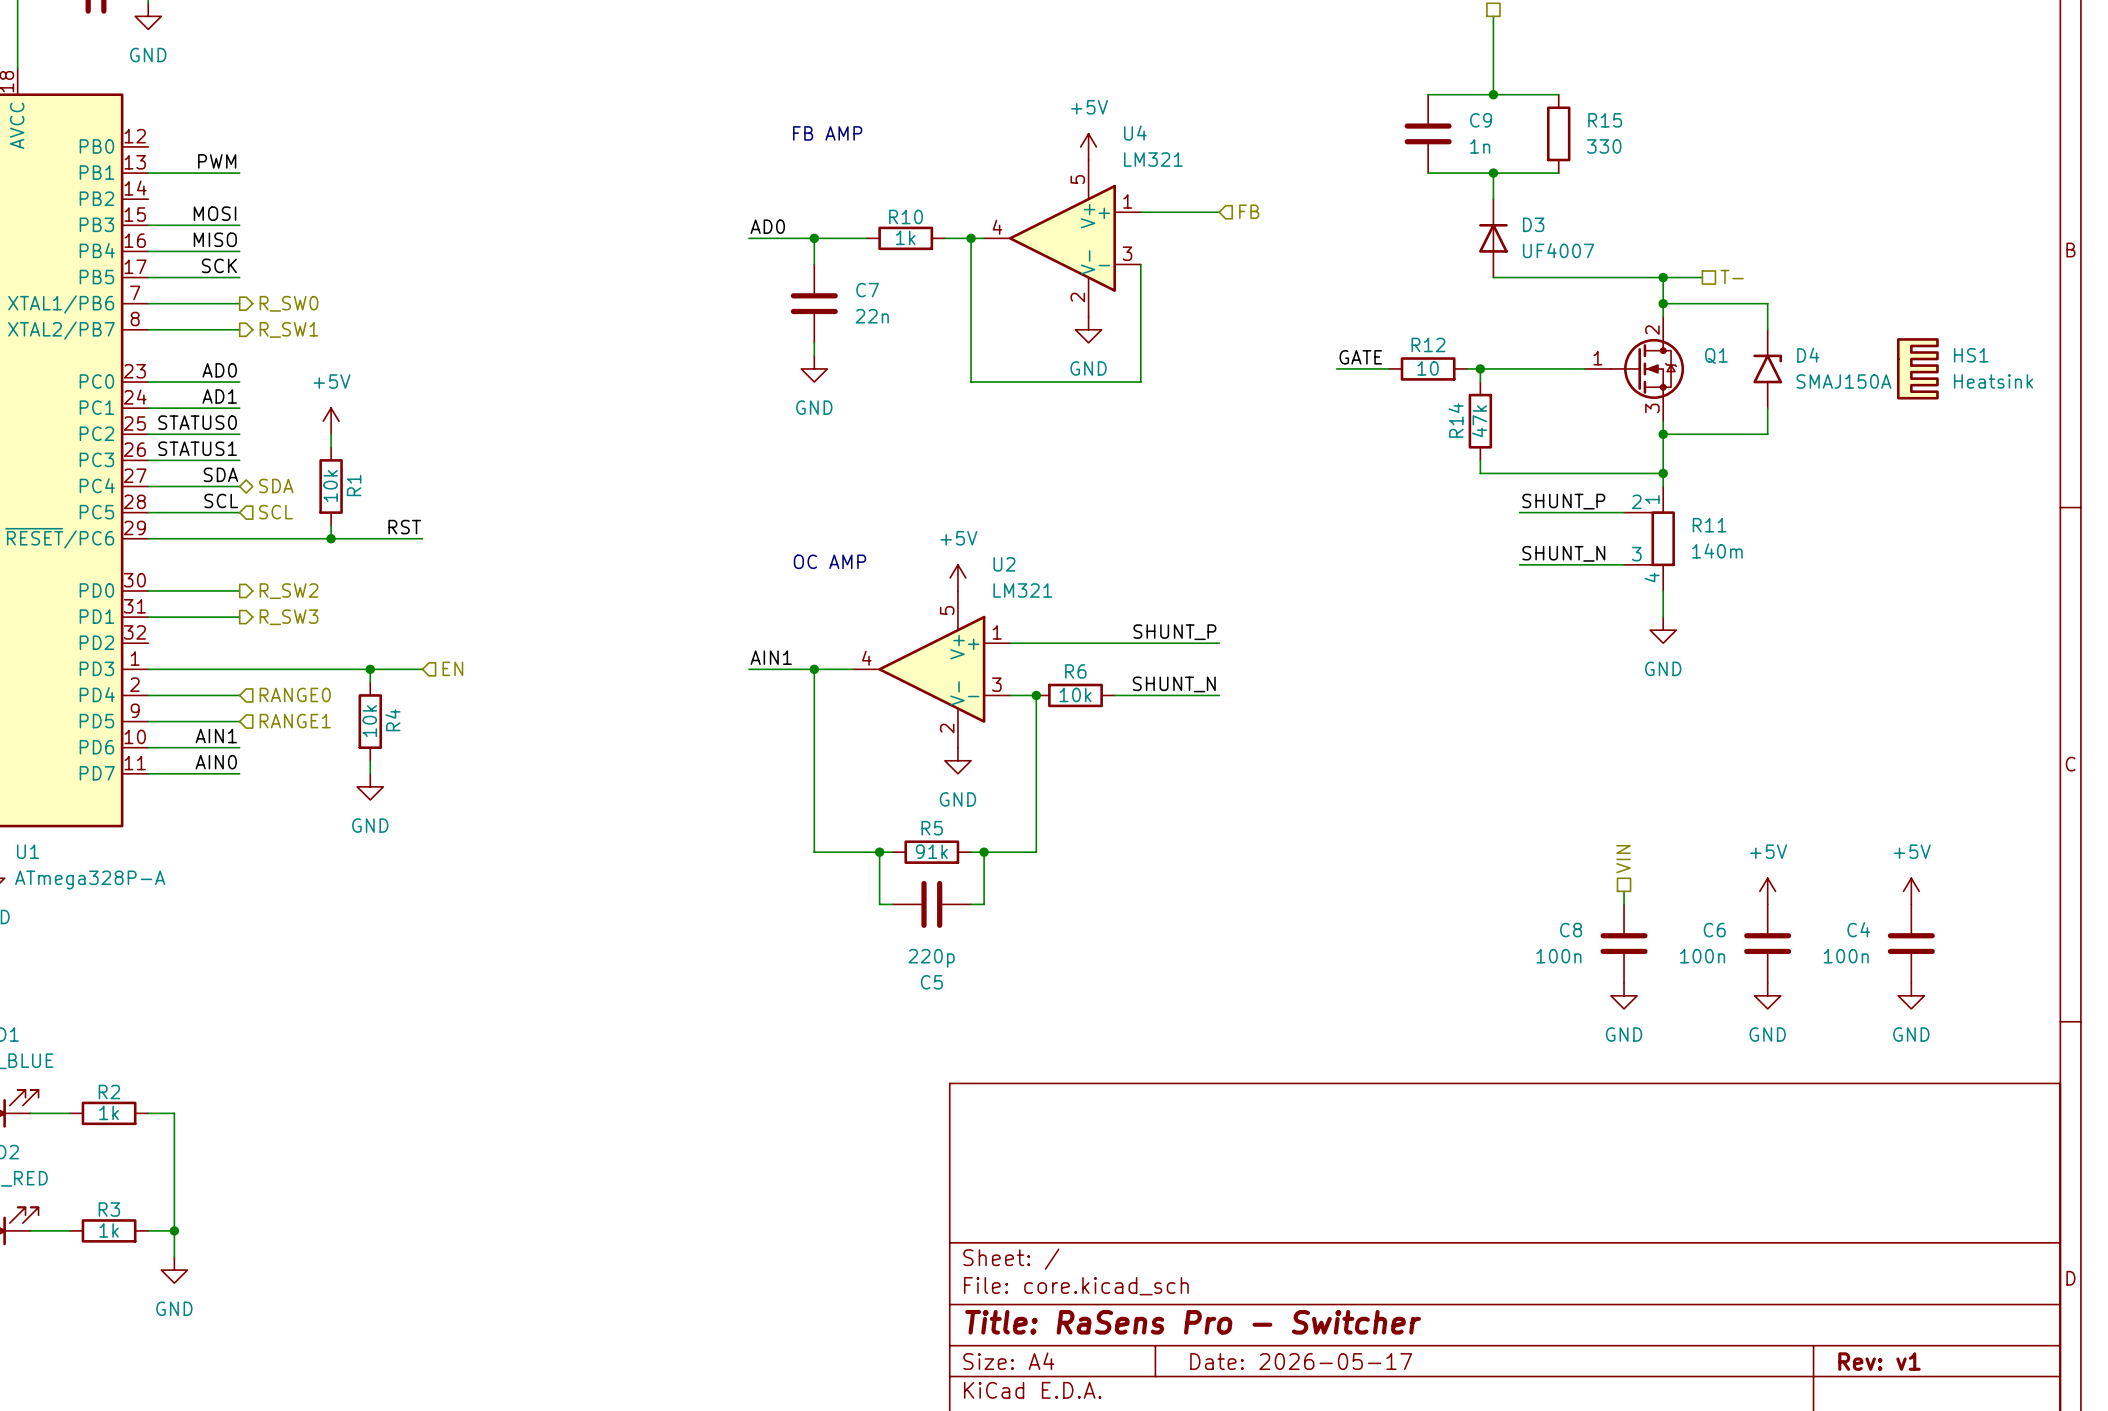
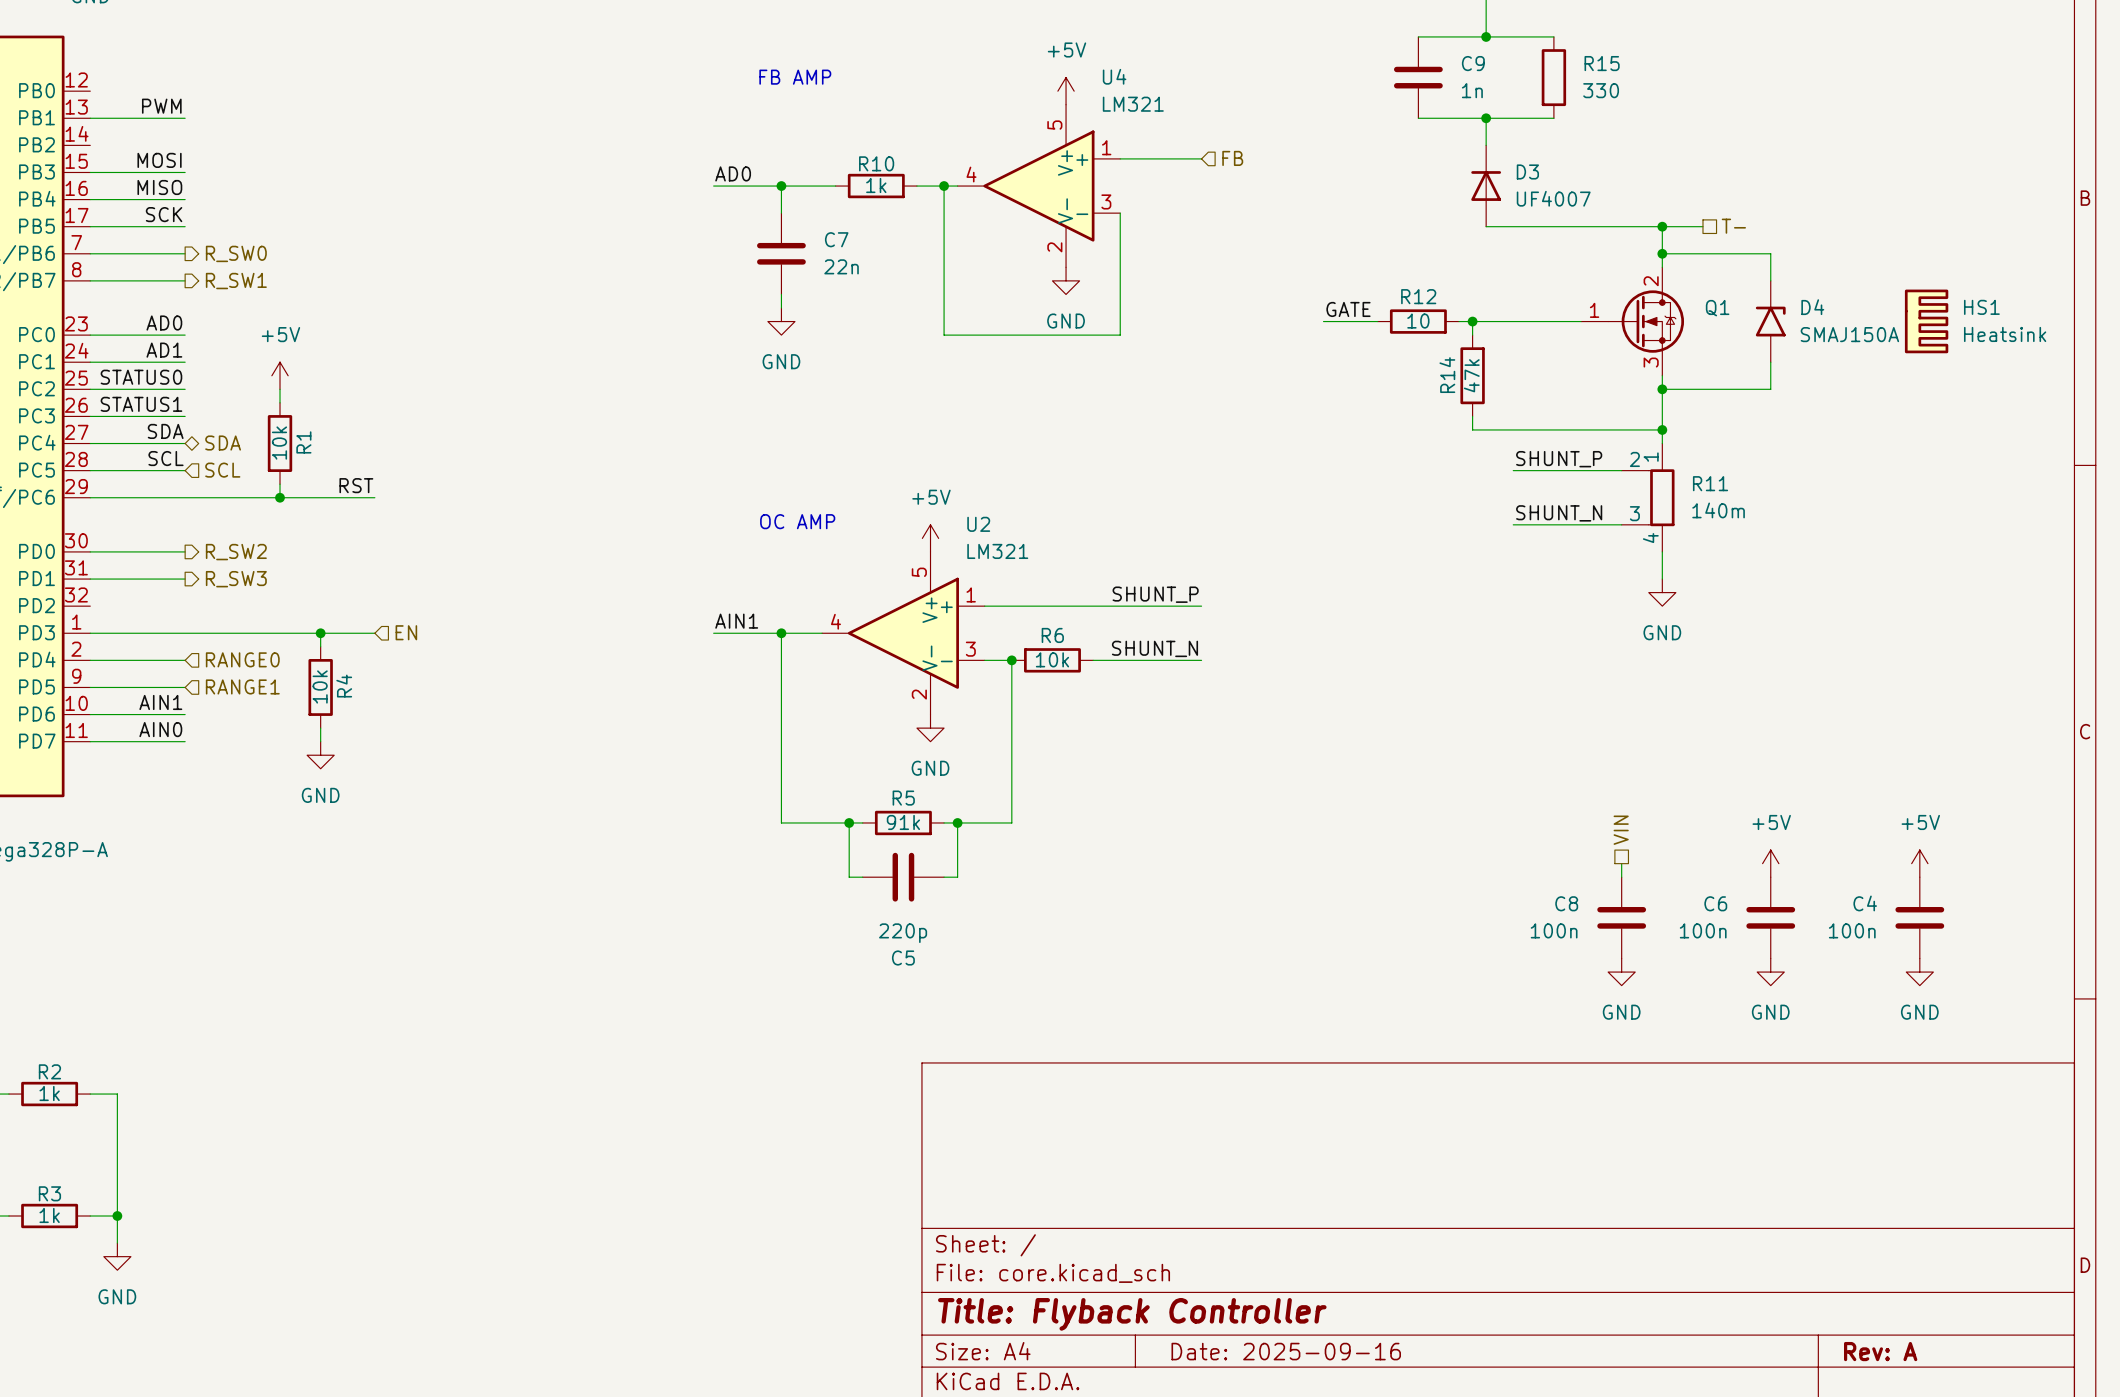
title block: Title: RaSens Pro - Switcher (1193, 1322) -> Title: Flyback Controller (1132, 1314)
title block: Date: 2026-05-17 (1301, 1361) -> Date: 2025-09-16 (1286, 1351)
title block: Rev: v1 (1879, 1361) -> Rev: A (1880, 1351)

